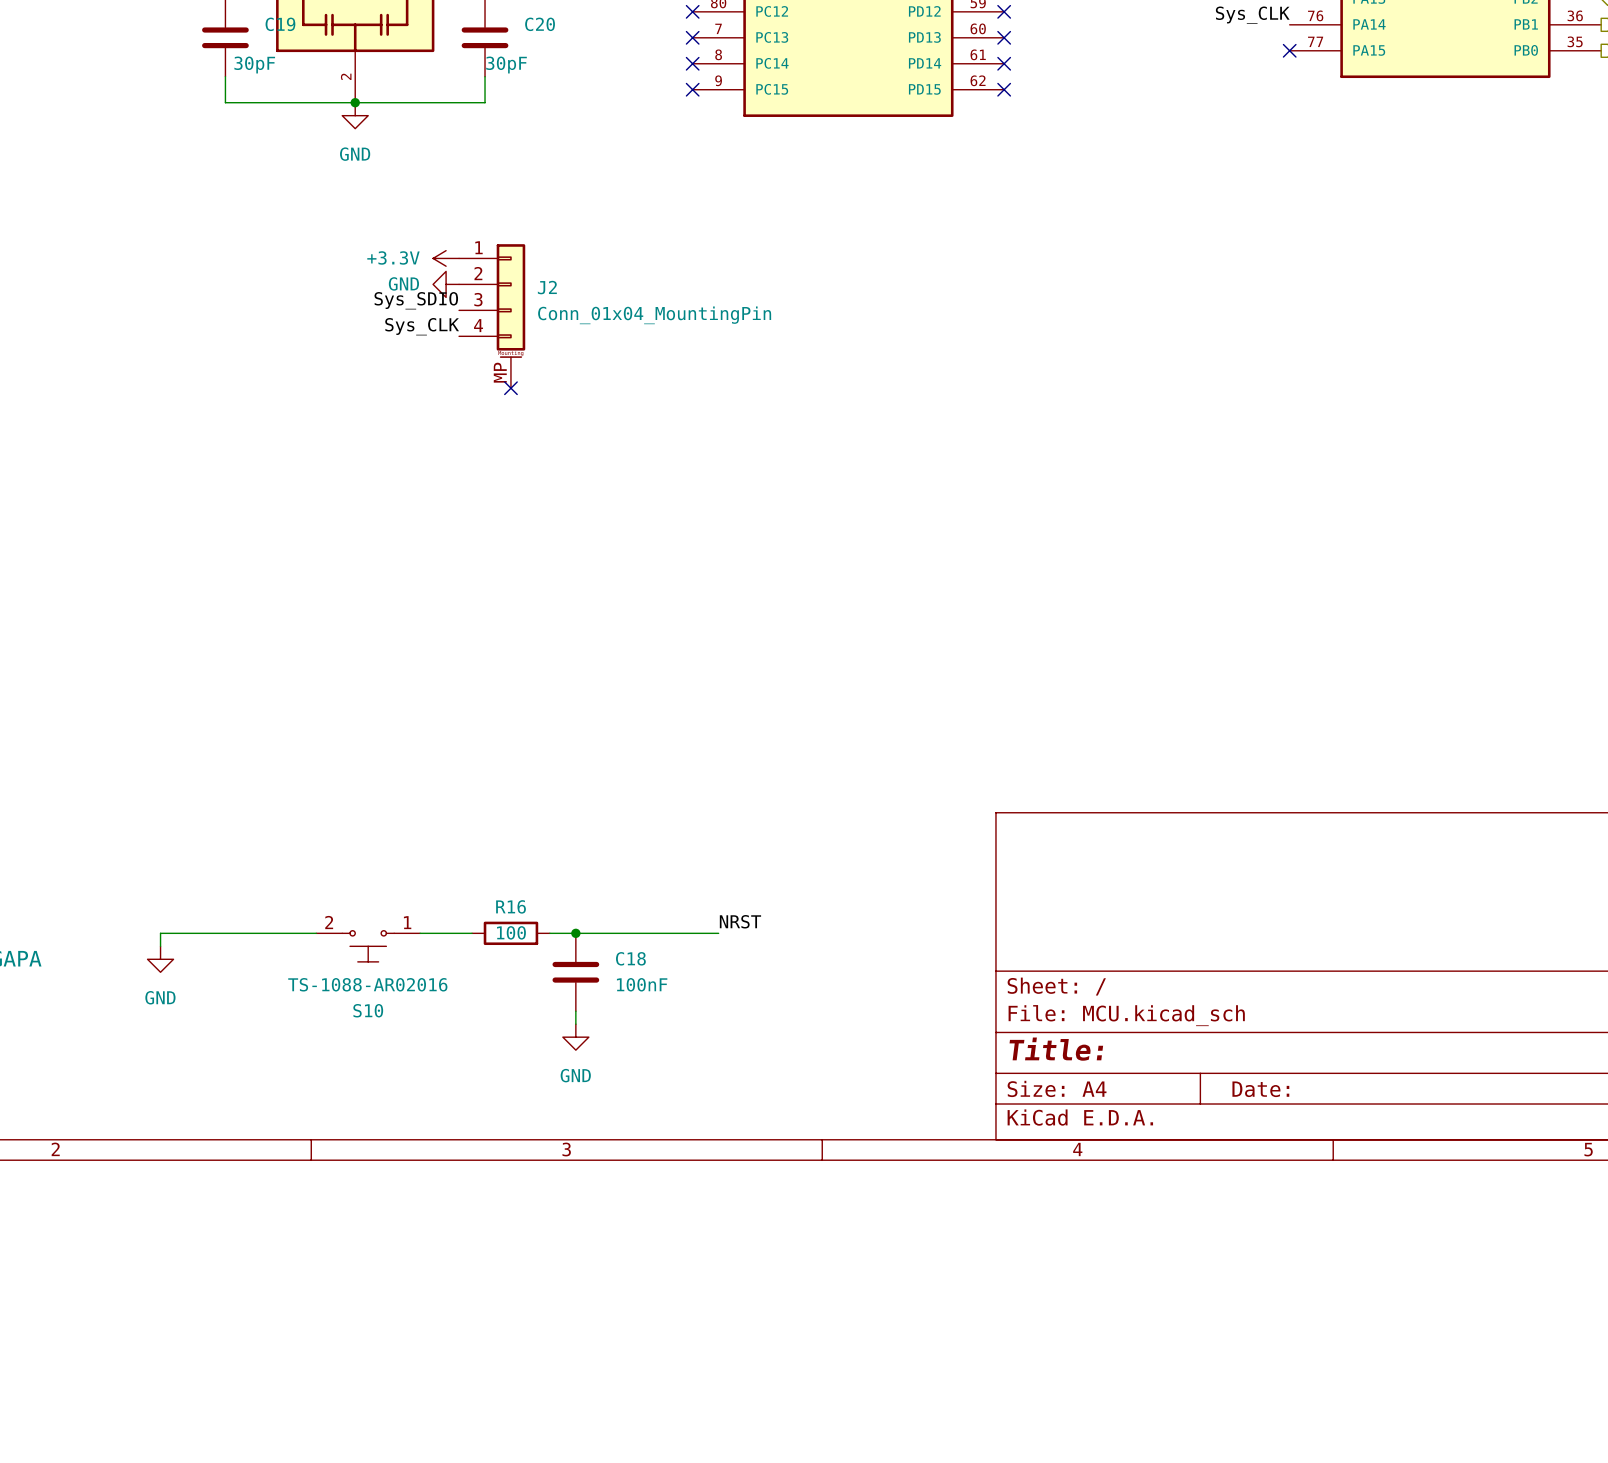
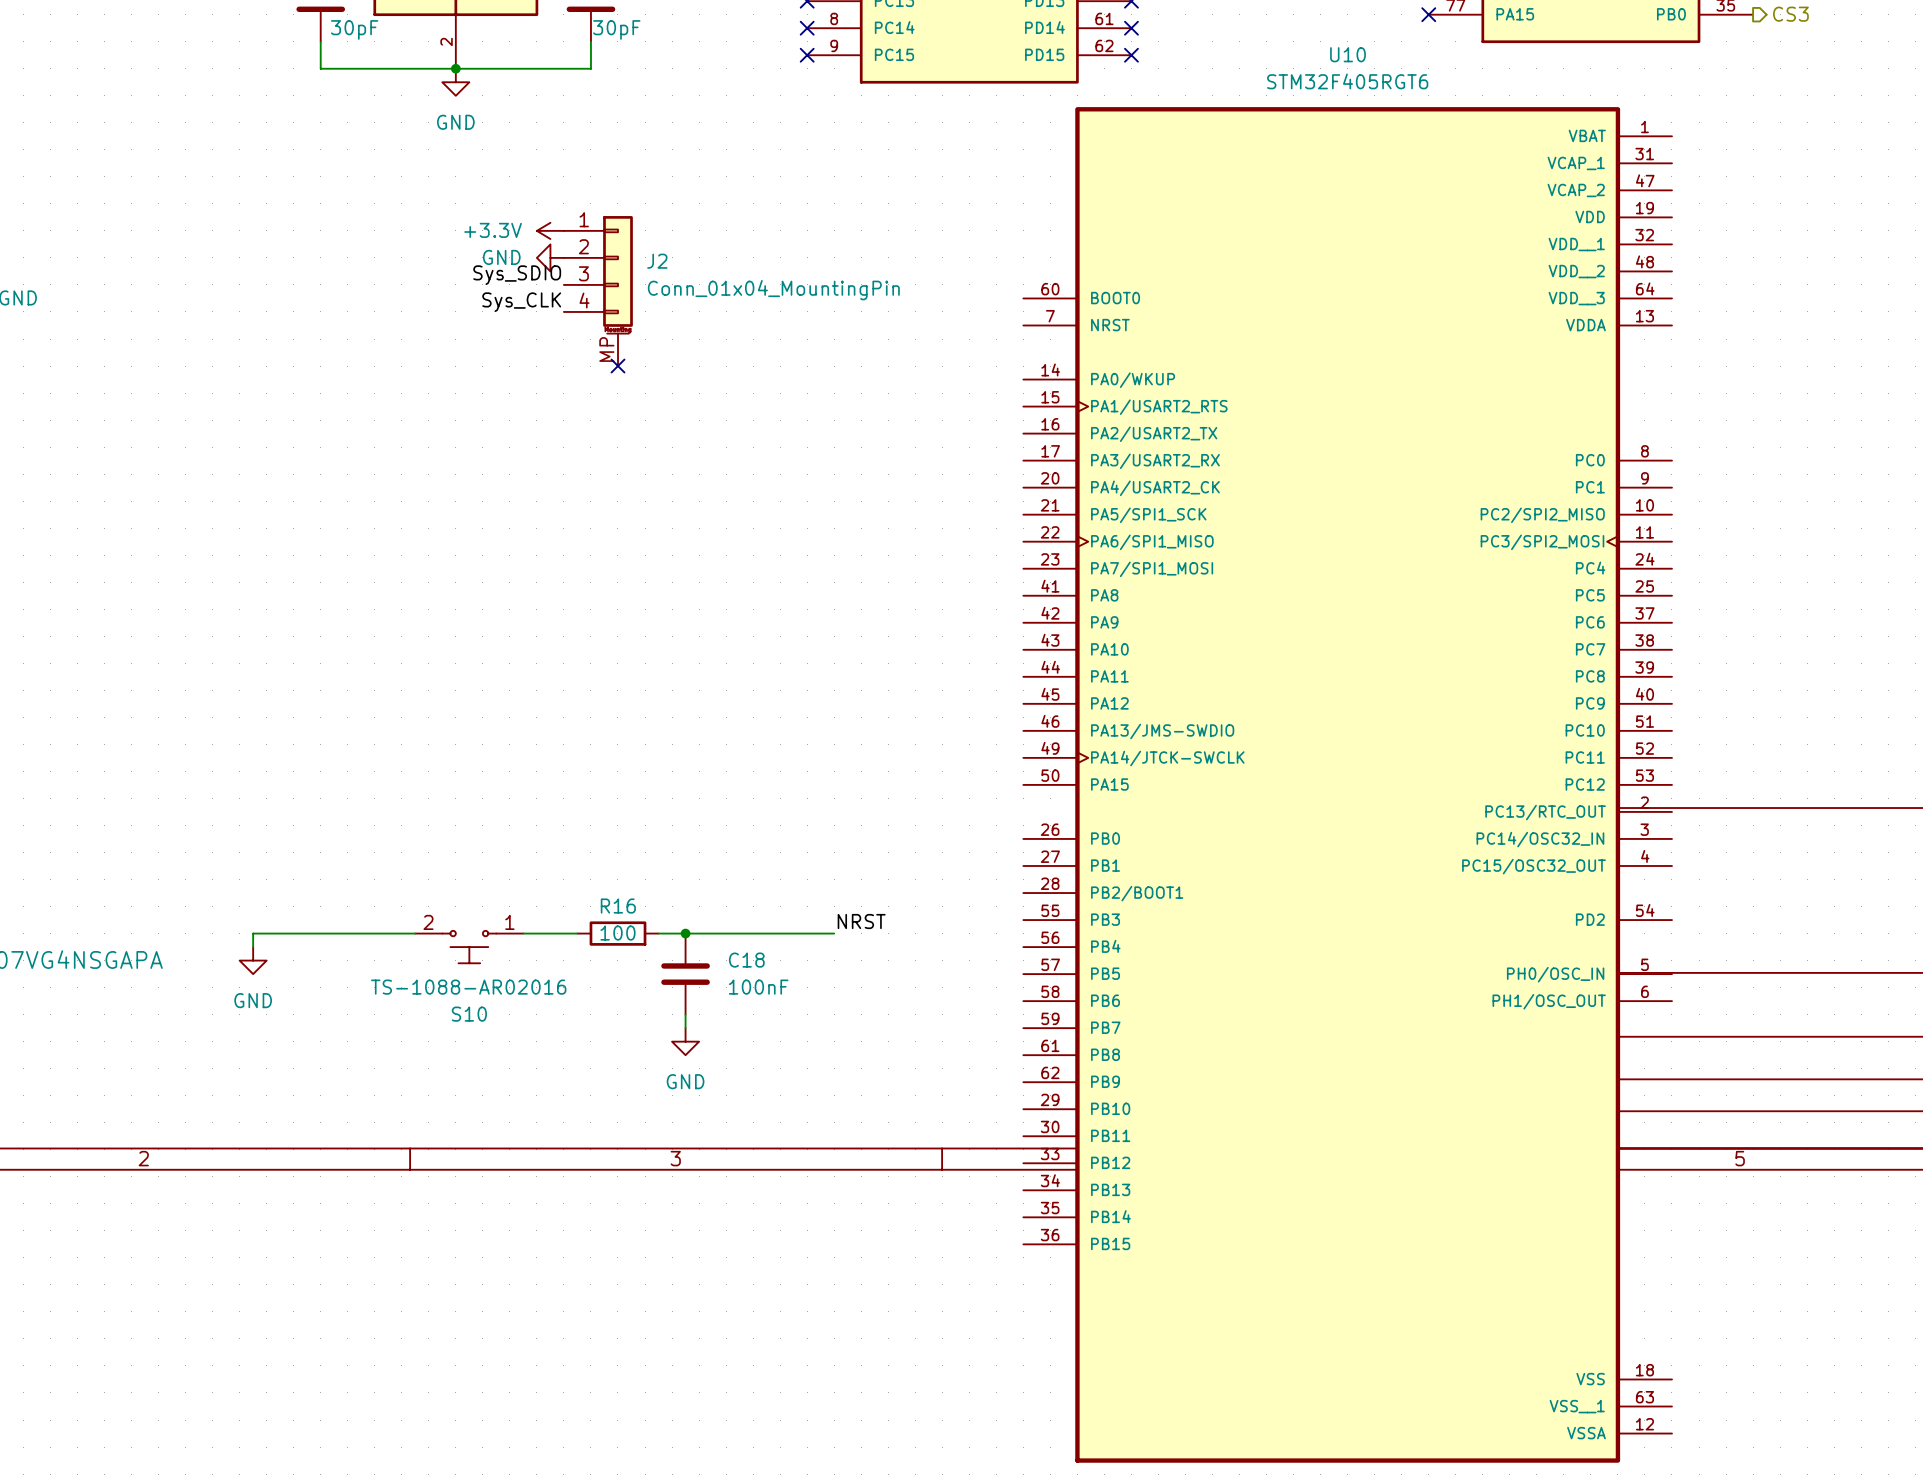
U10: none -> STM32F405RGT6 (1347, 784)

